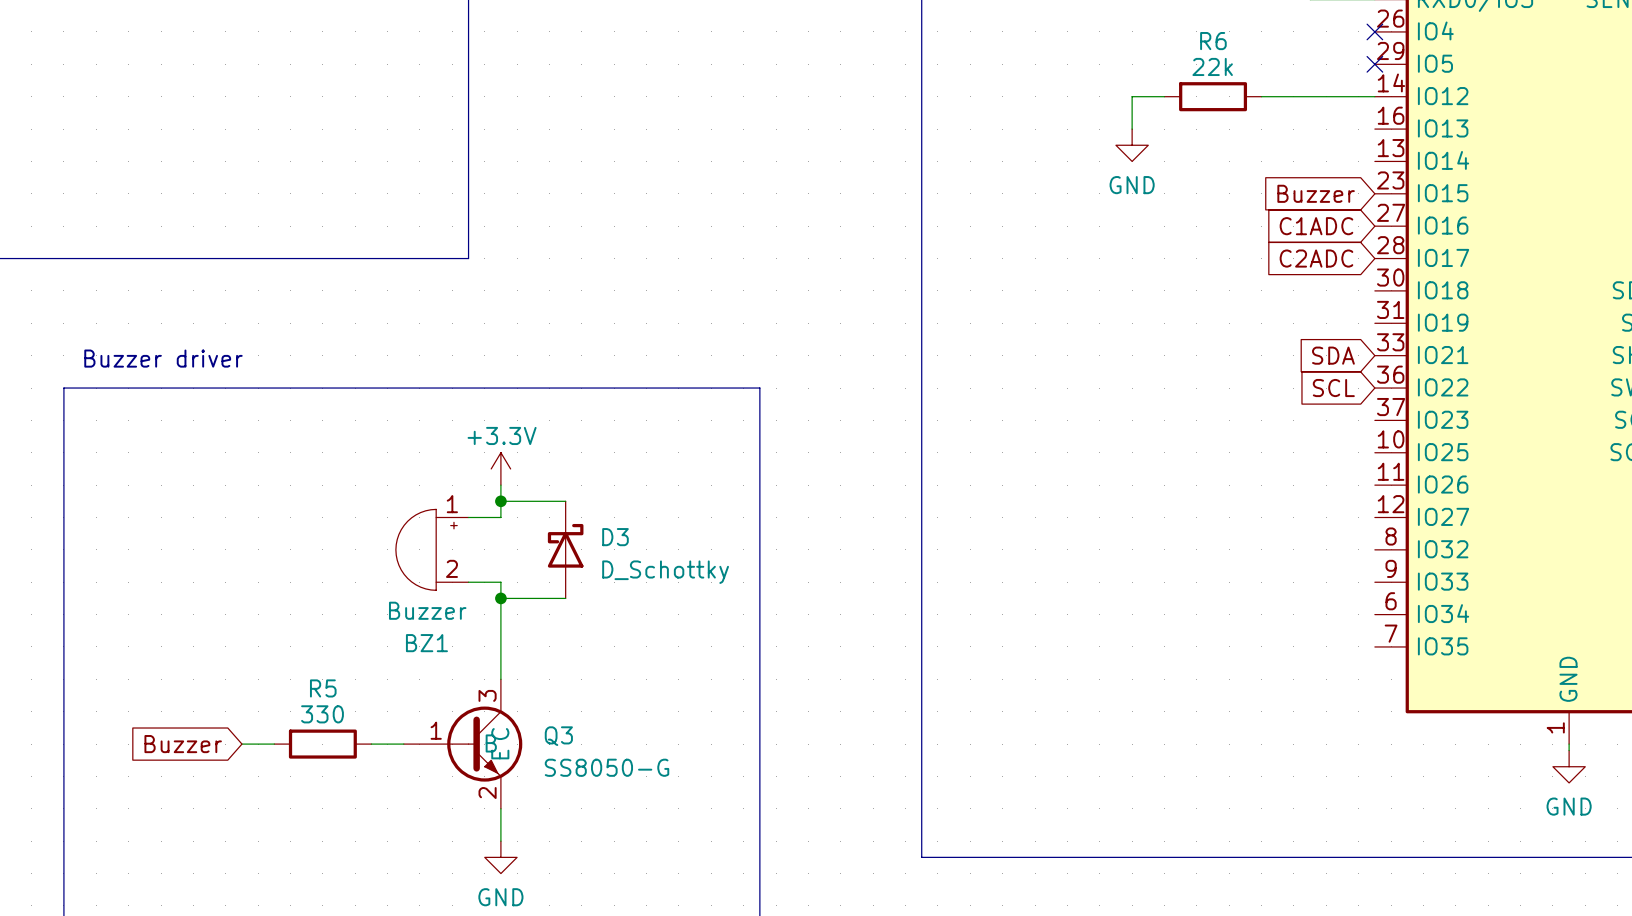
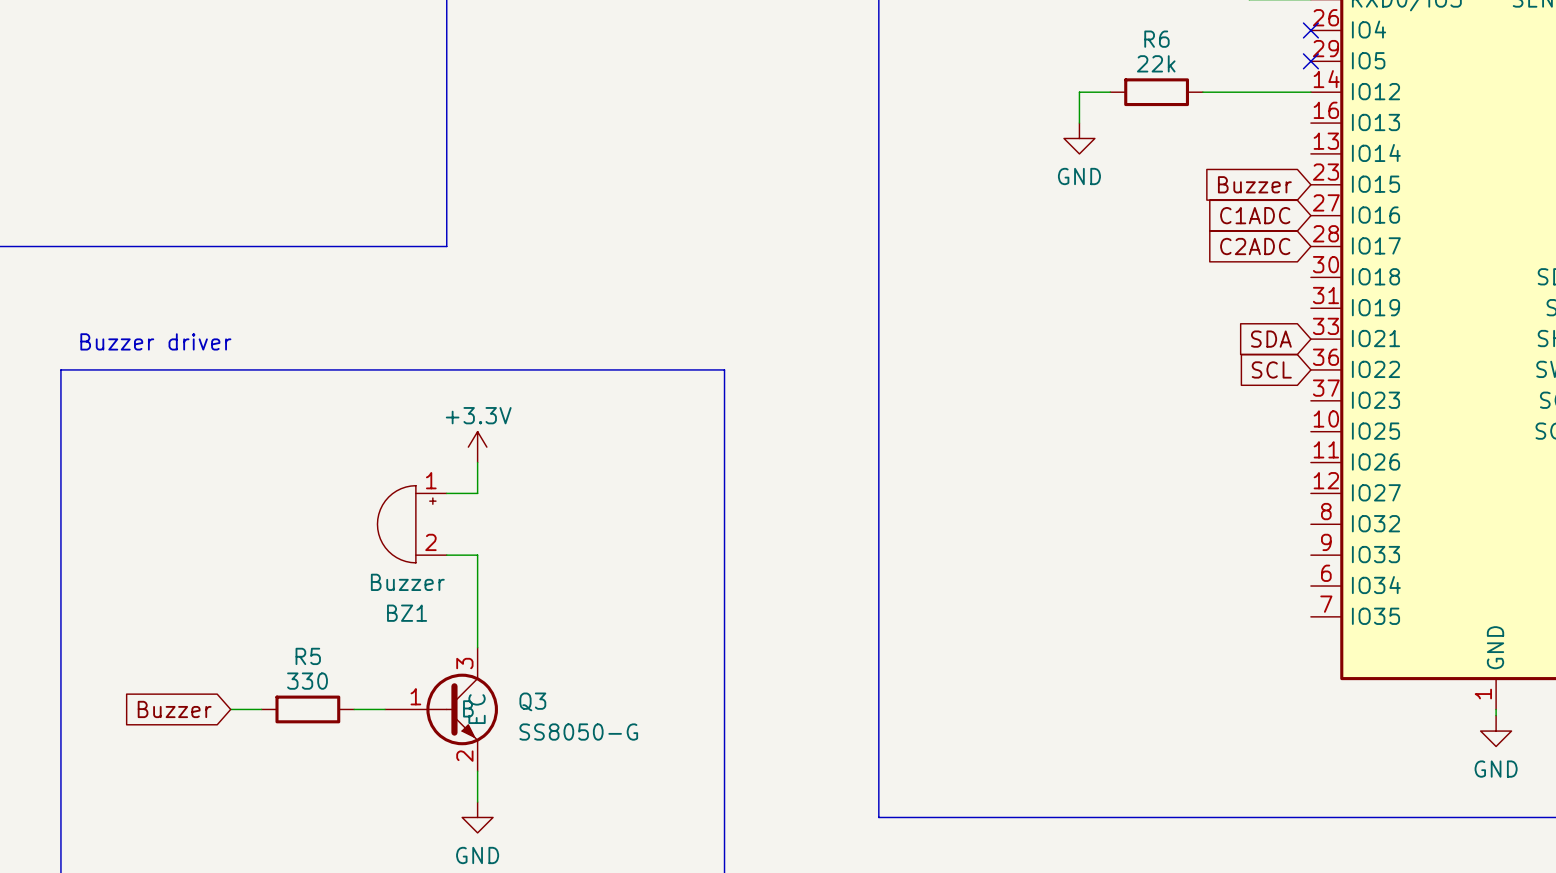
wire: (500, 501) (565, 501) -> none
junction: (500, 501) -> none
D3: D_Schottky (565, 549) -> none
wire: (500, 598) (565, 598) -> none
junction: (500, 598) -> none

